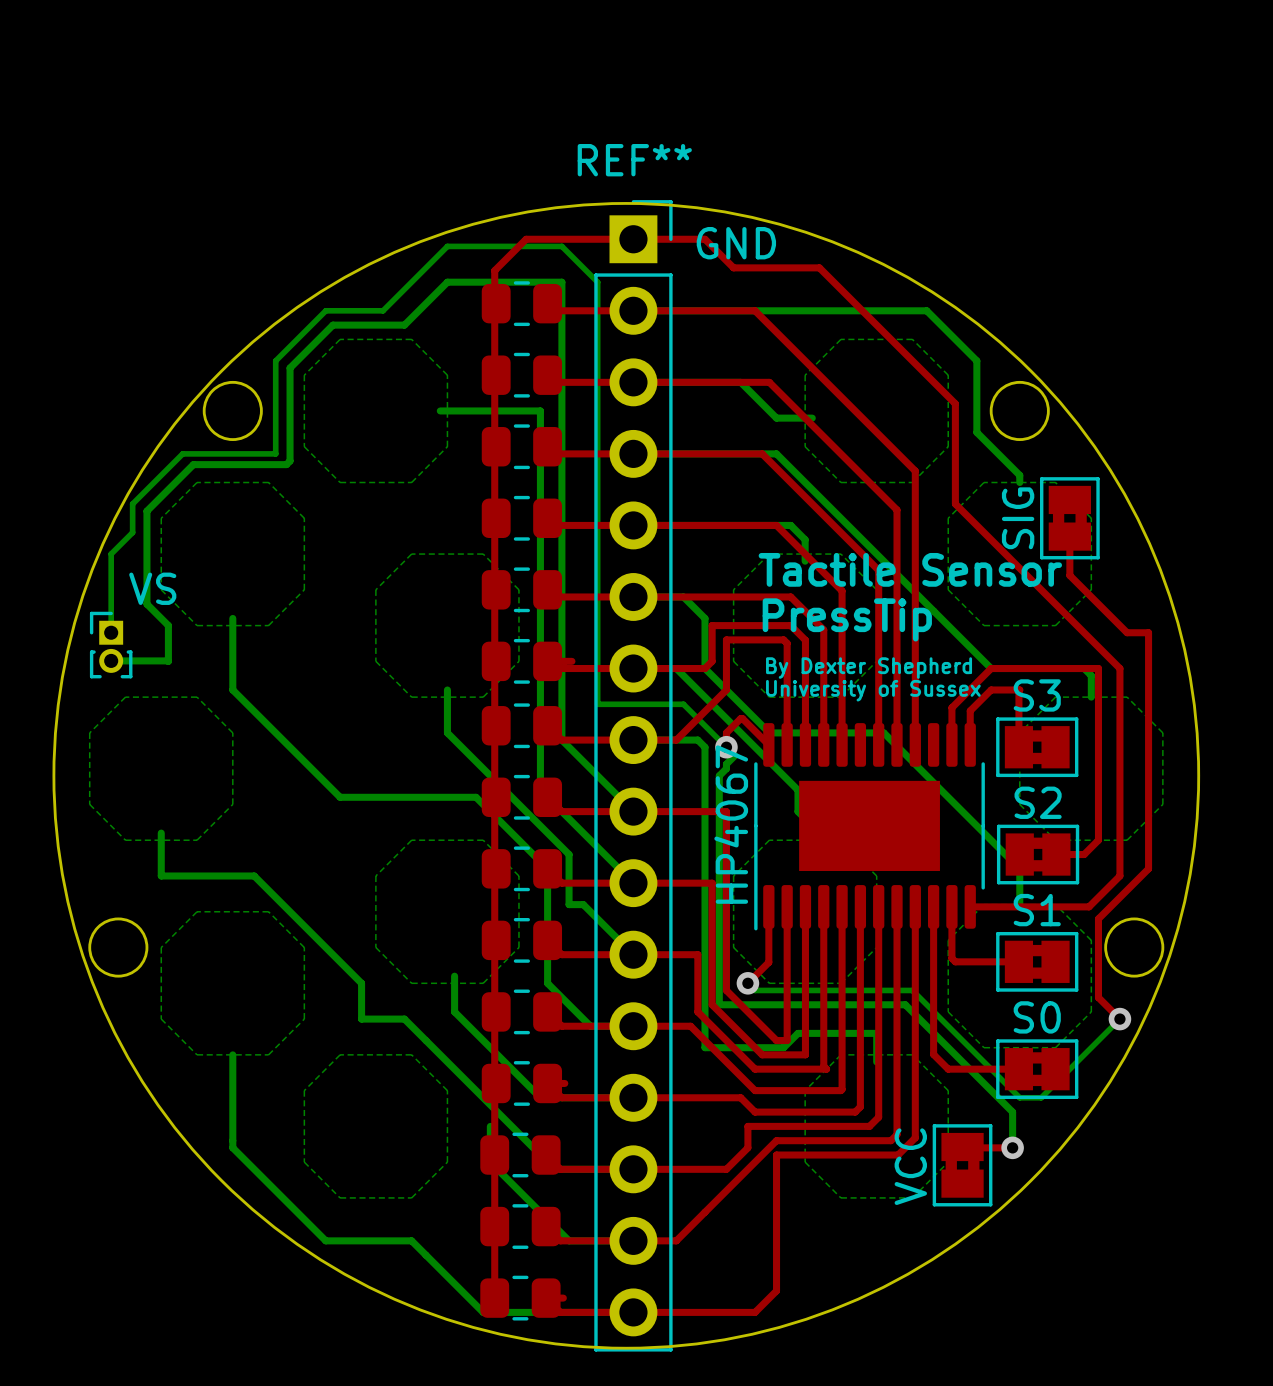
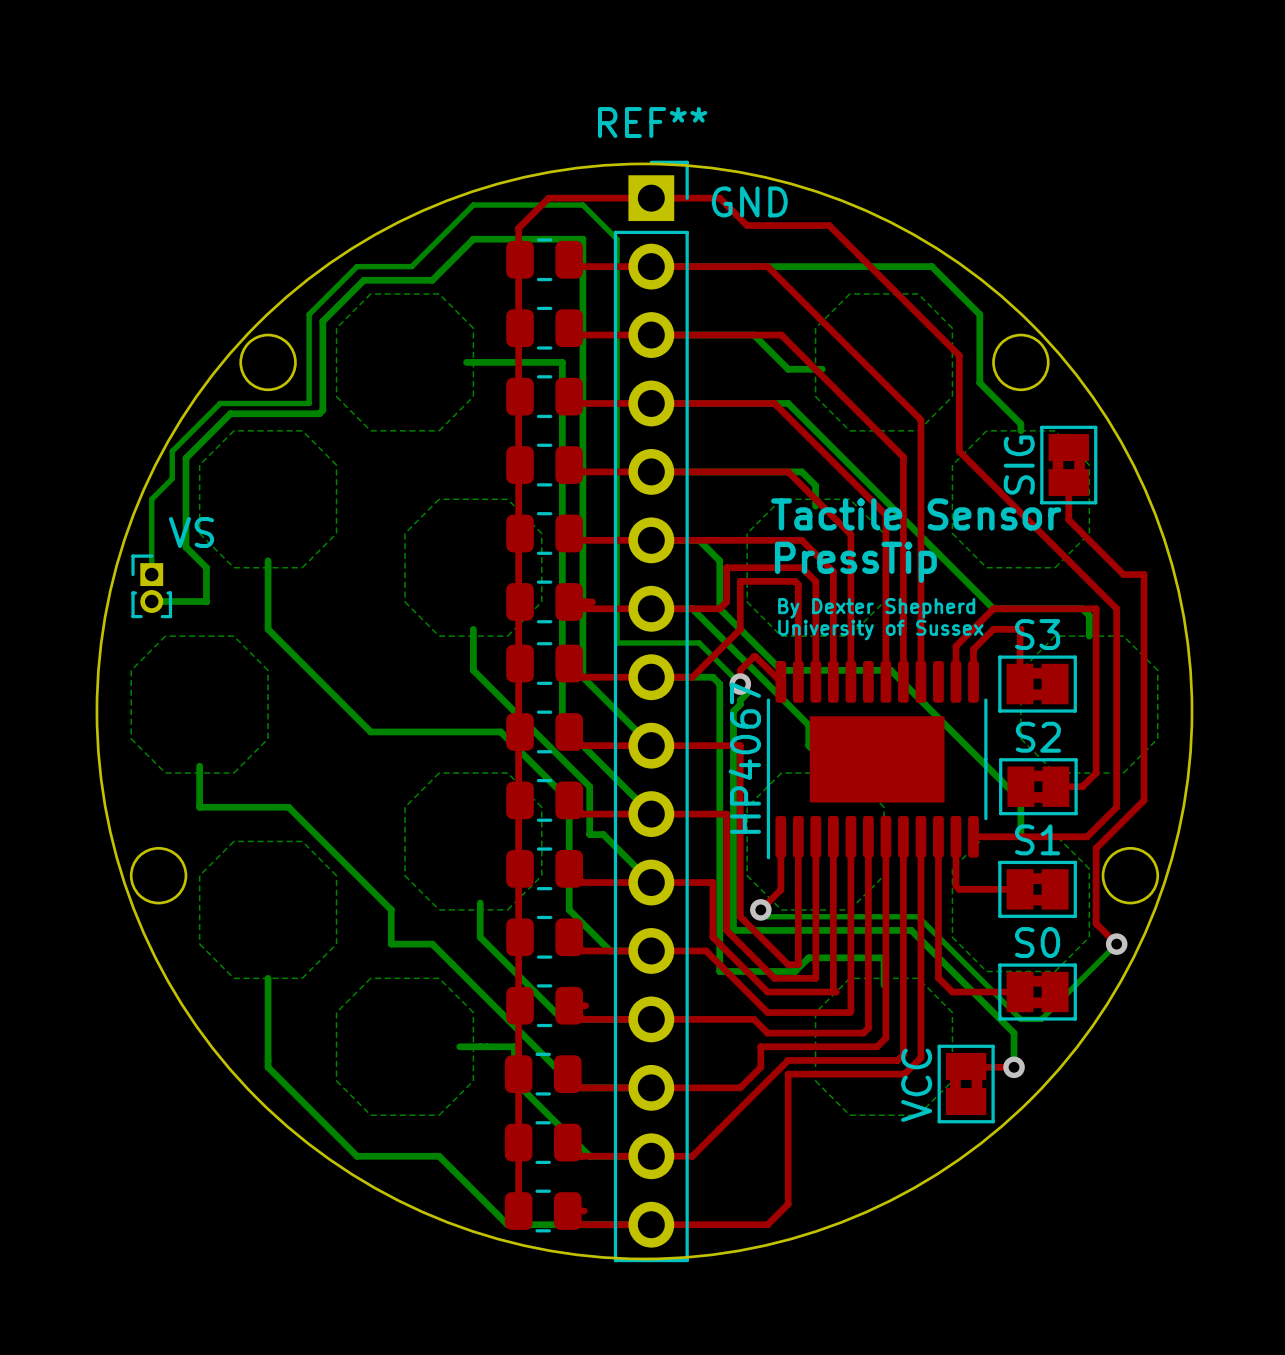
bottom track: none -> (459, 1046) (514, 1046)

